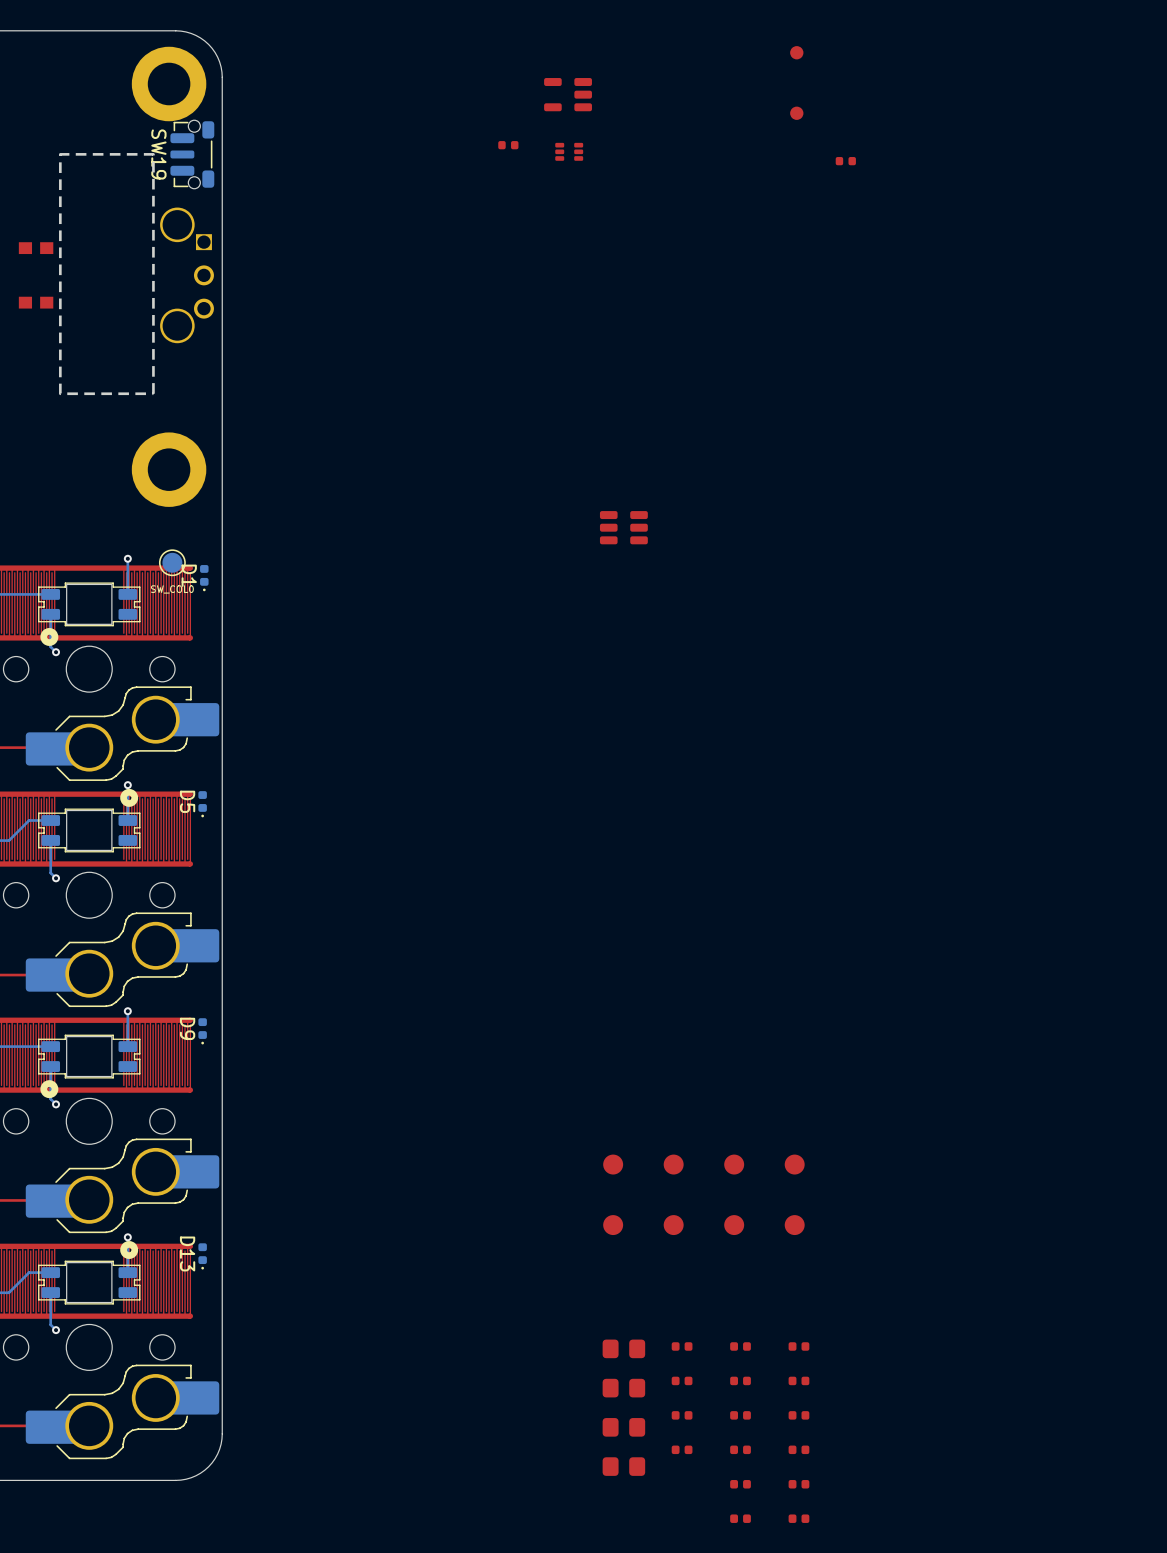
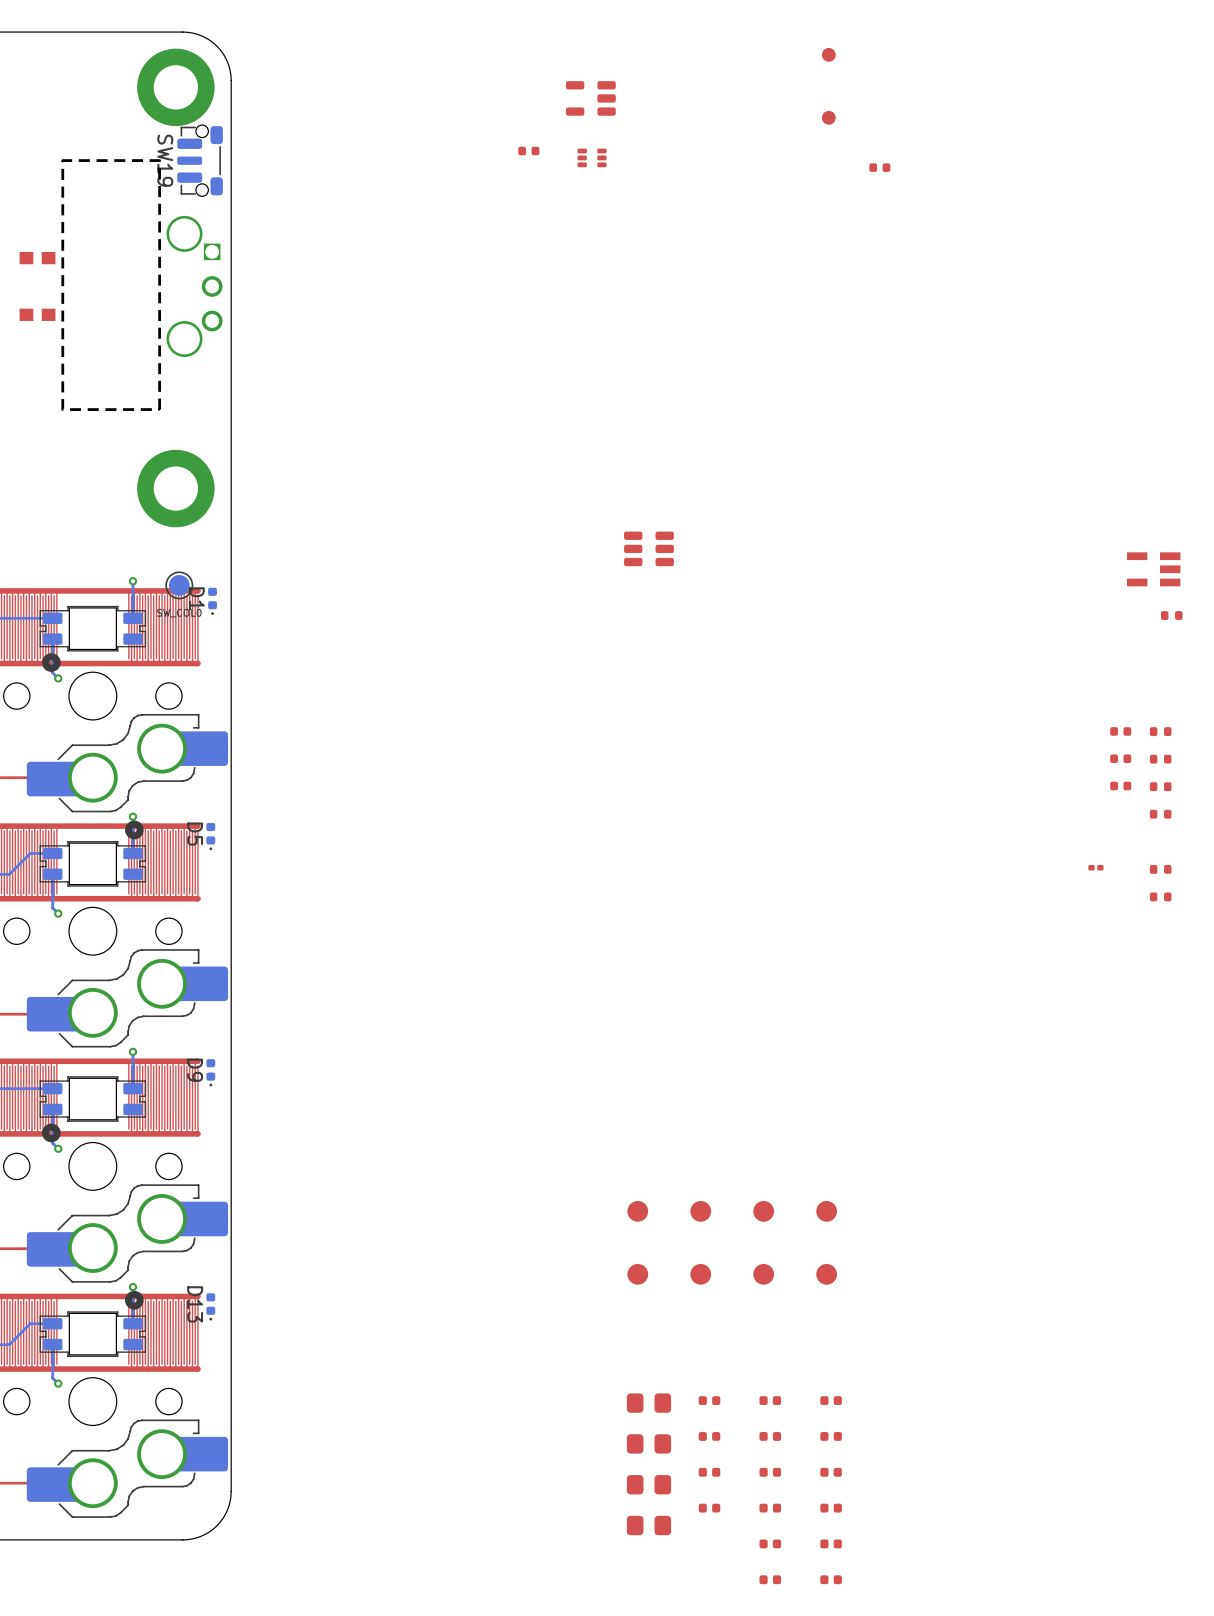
part: none -> (1153, 569)
part: none -> (1171, 615)
part: none -> (1120, 731)
part: none -> (1160, 731)
part: none -> (1120, 758)
part: none -> (1160, 759)
part: none -> (1120, 785)
part: none -> (1160, 786)
part: none -> (1160, 814)
part: none -> (1095, 867)
part: none -> (1160, 869)
part: none -> (1160, 896)

